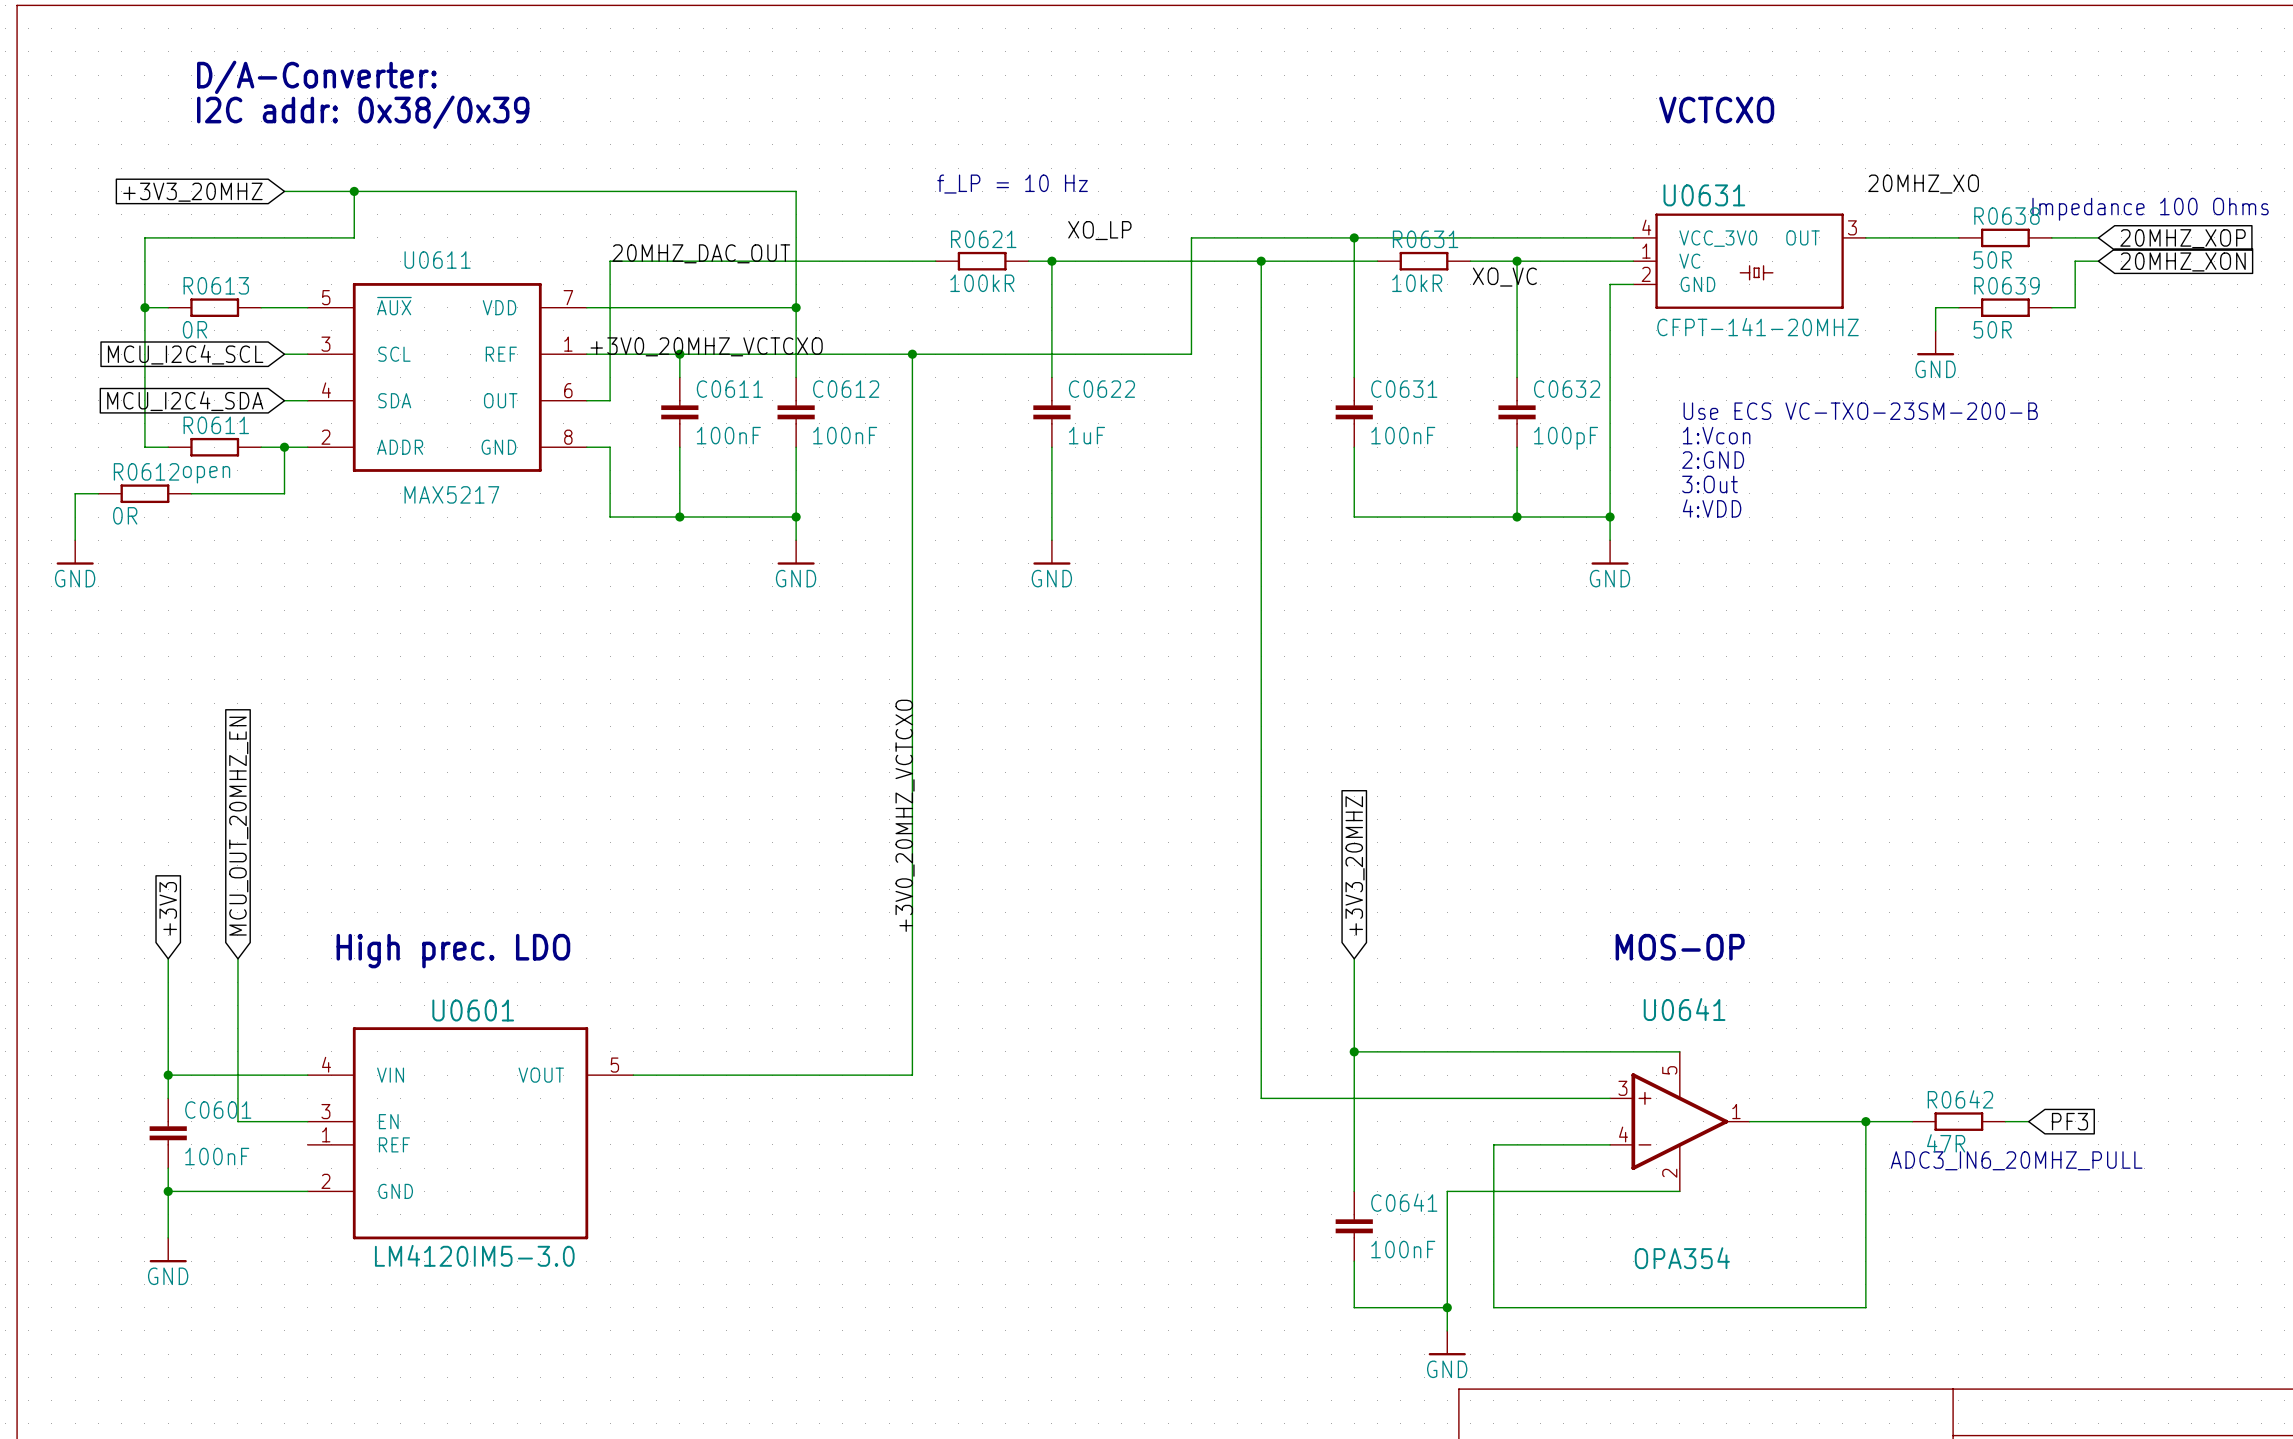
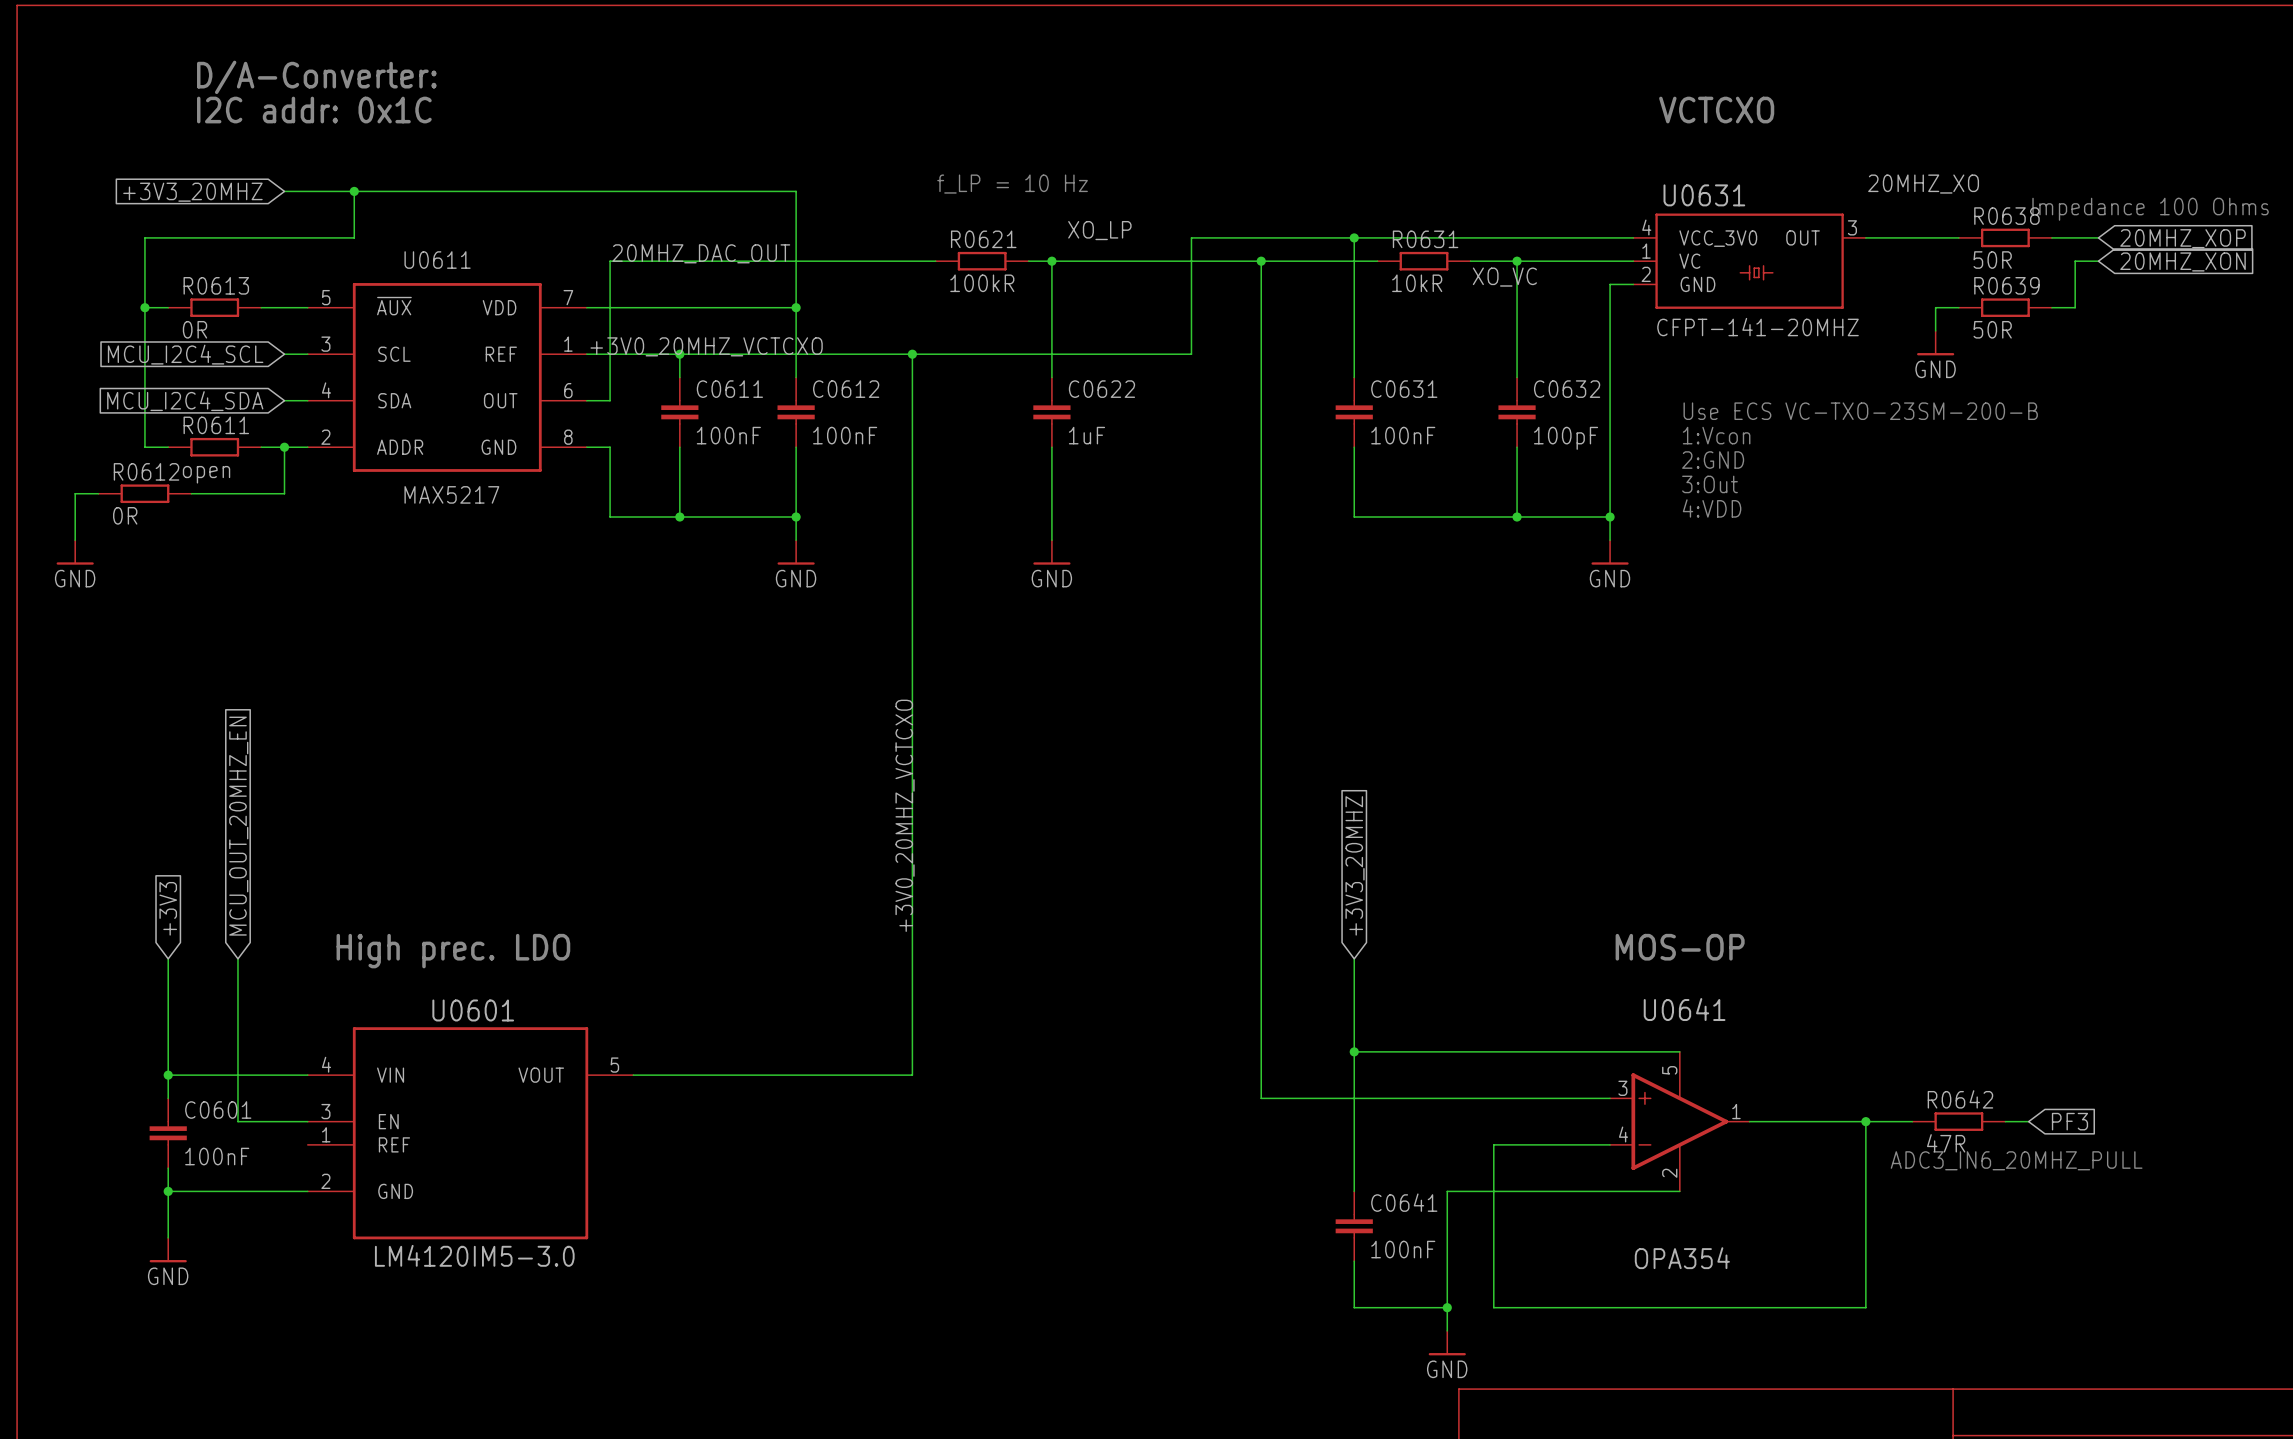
text: I2C addr: 0x38/0x39 (363, 112) -> I2C addr: 0x1C (314, 110)

